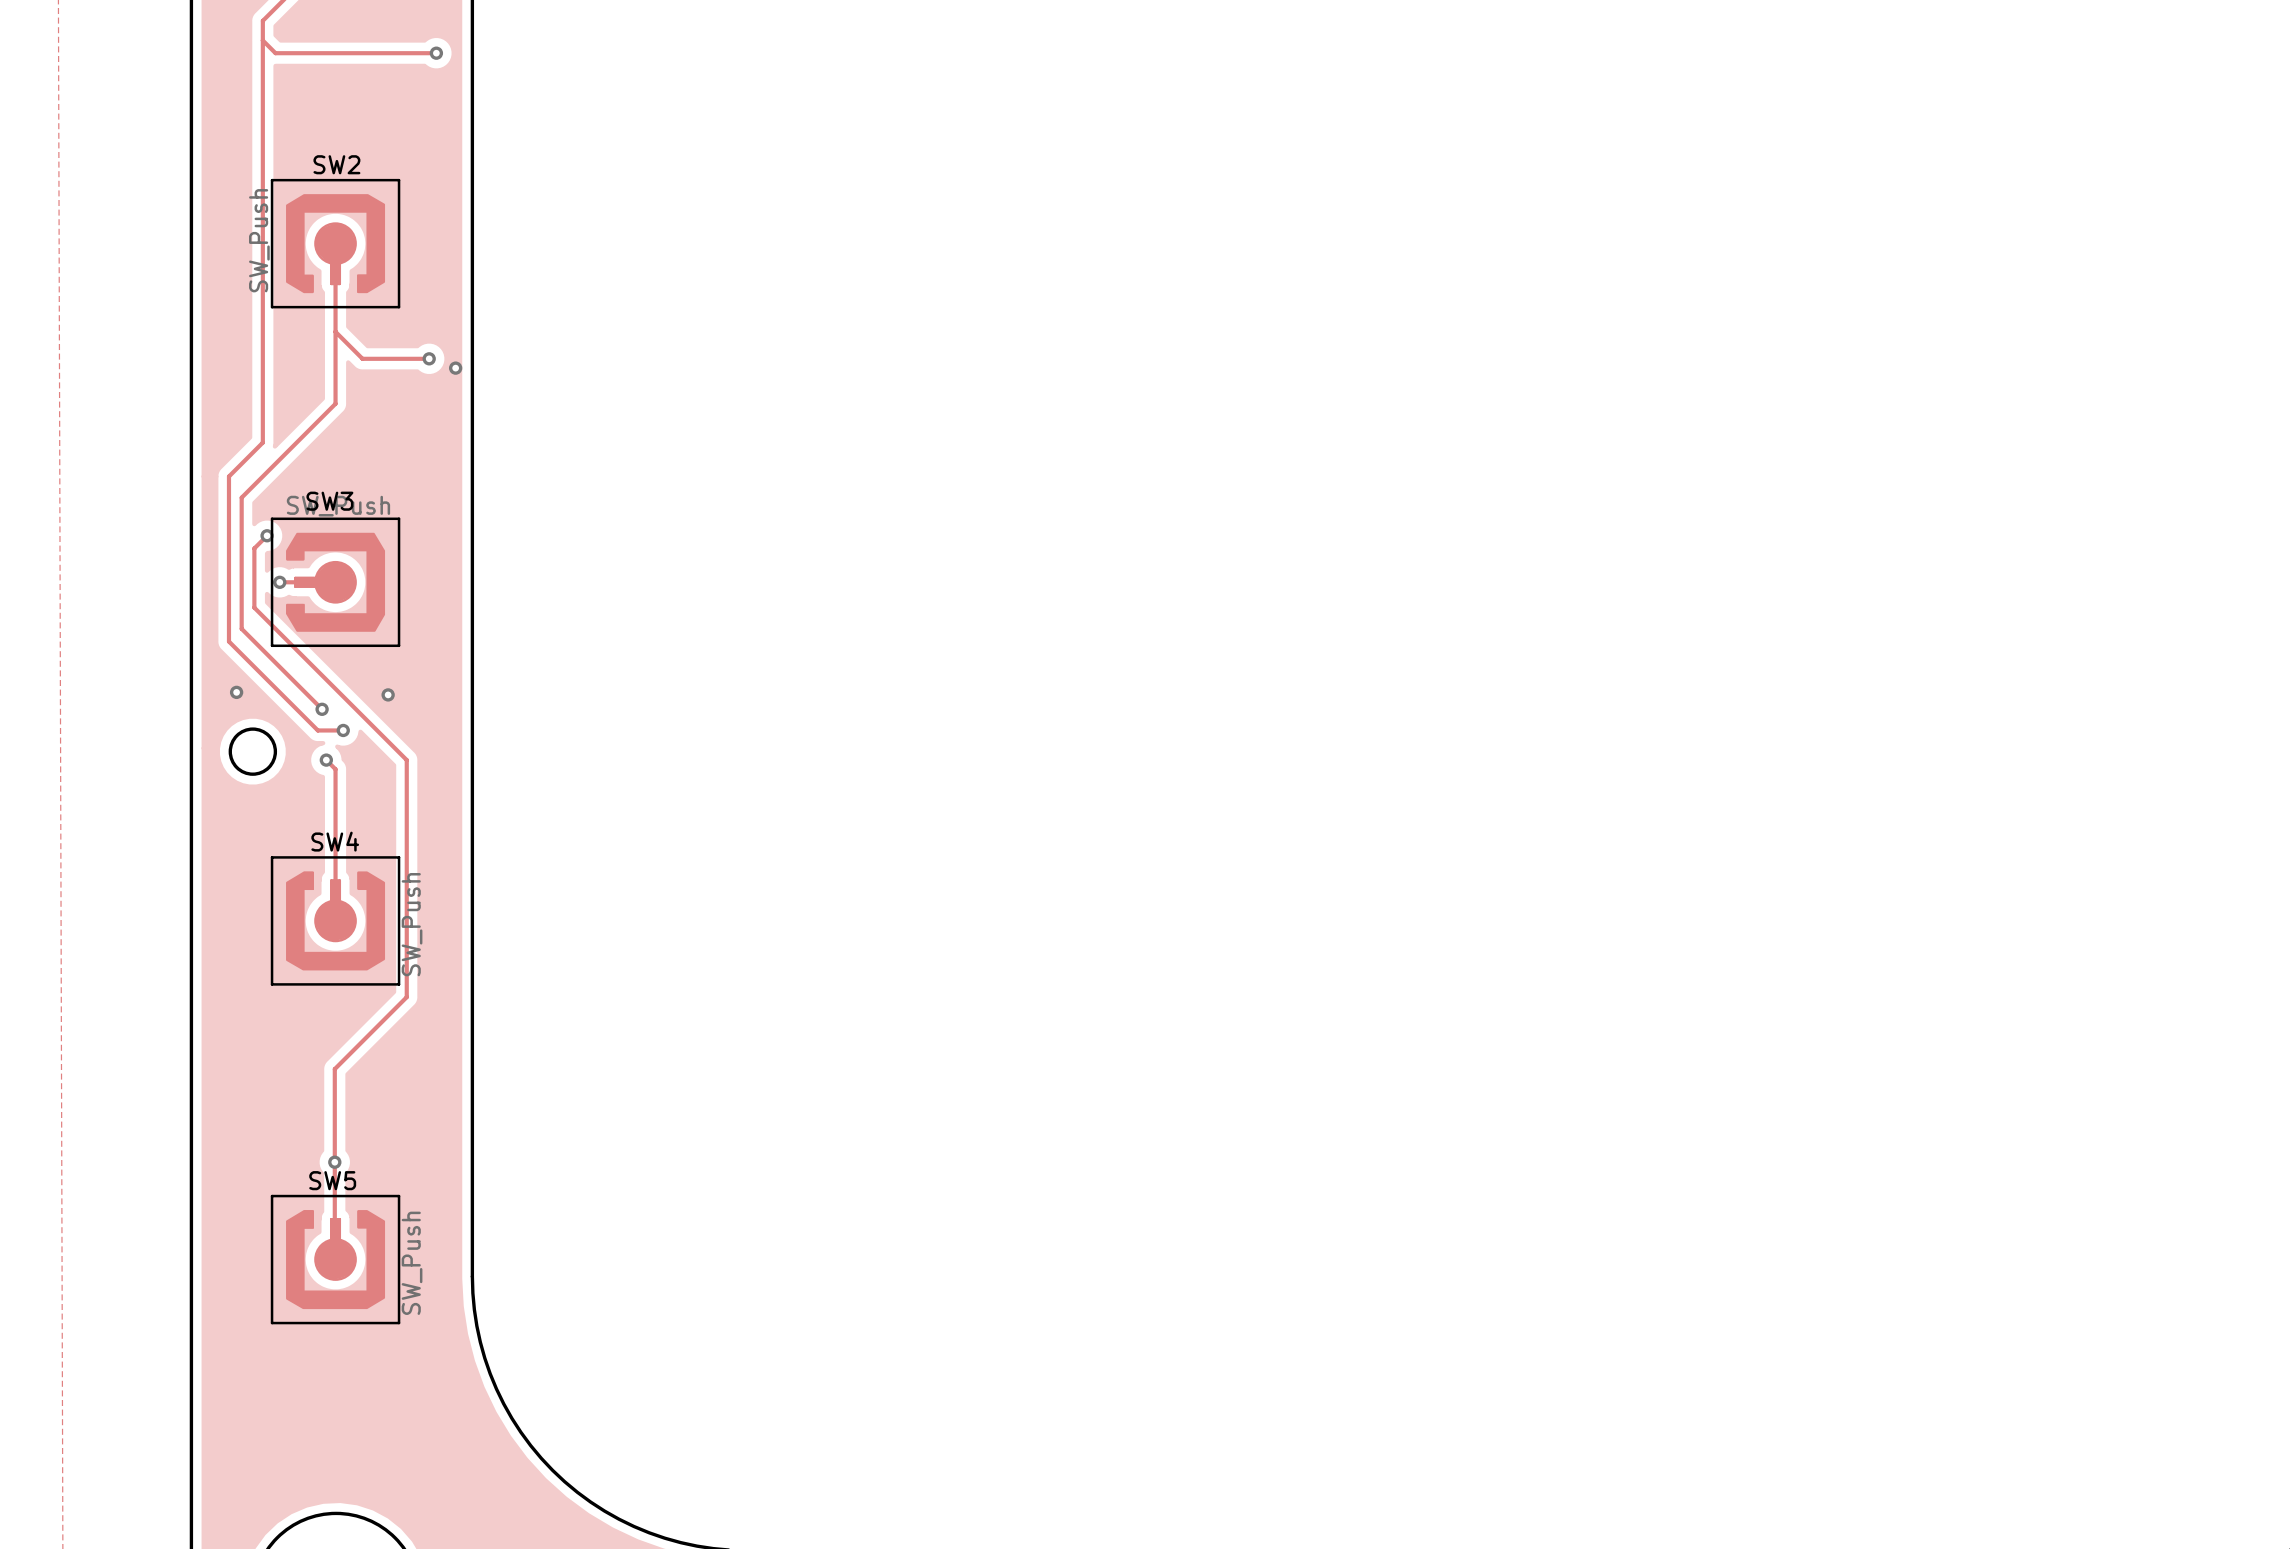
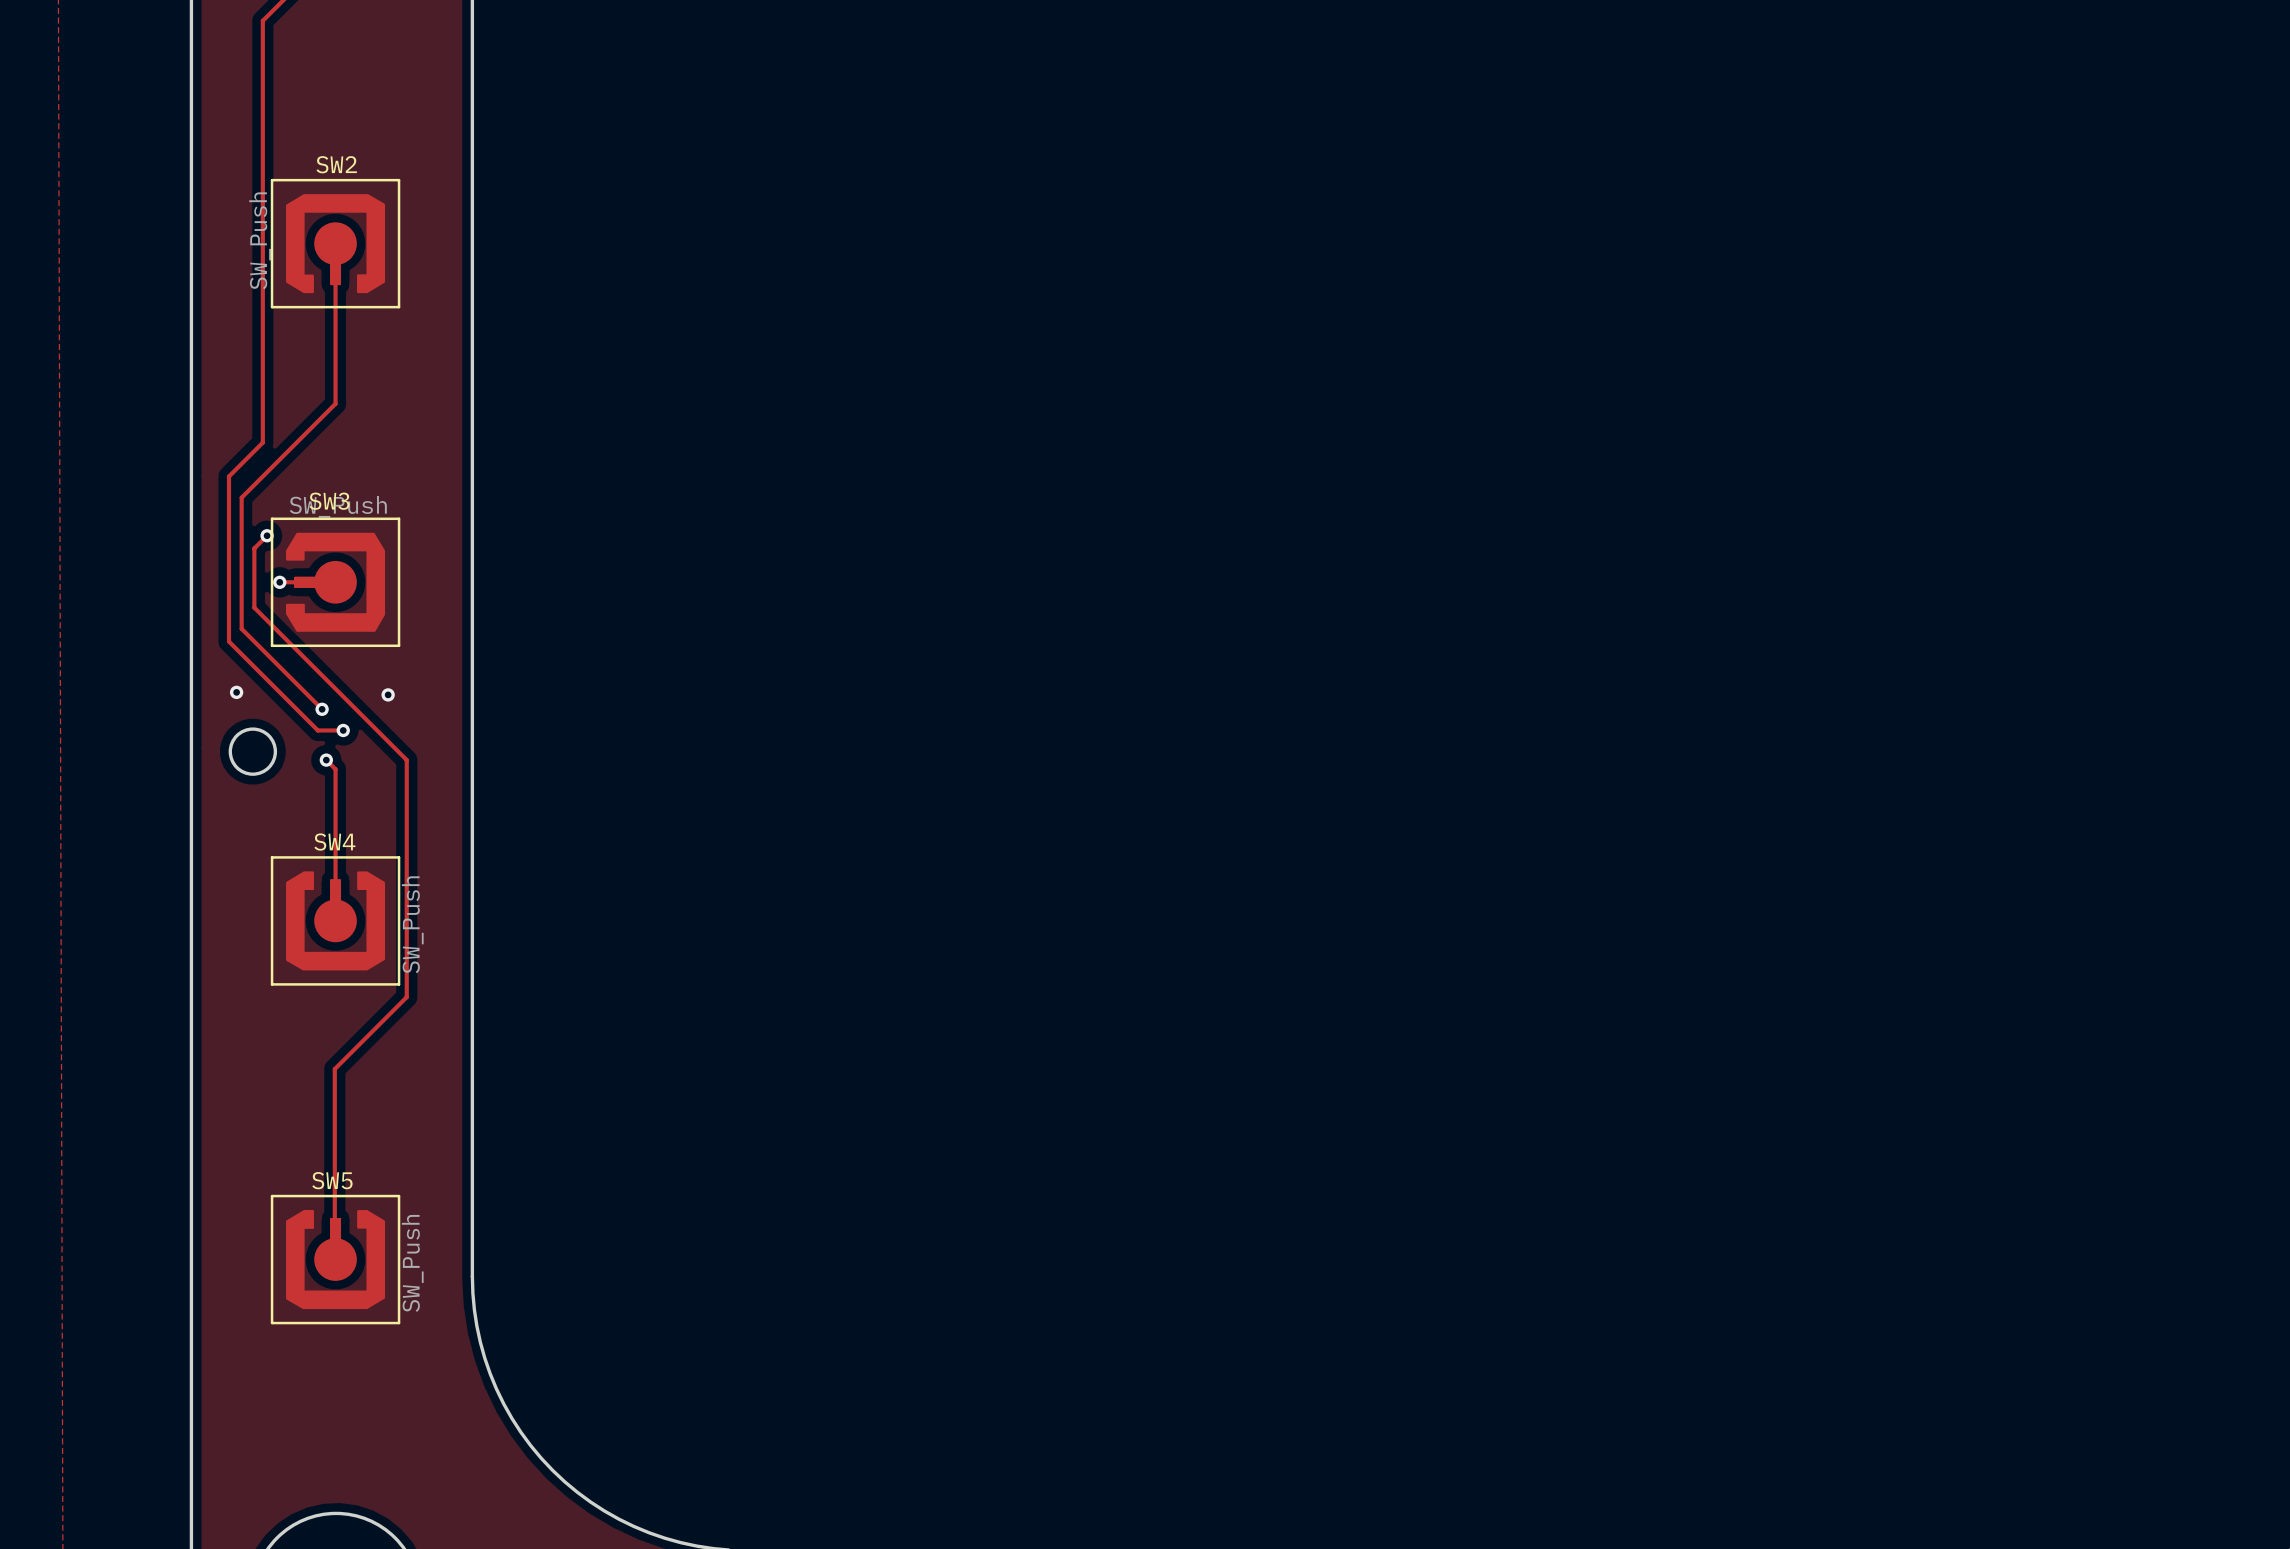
track: (262, 40) (275, 53) (436, 53) -> none
via: (436, 53) -> none
track: (335, 331) (362, 358) (429, 358) -> none
via: (429, 358) -> none
via: (455, 368) -> none
via: (334, 1162) -> none

